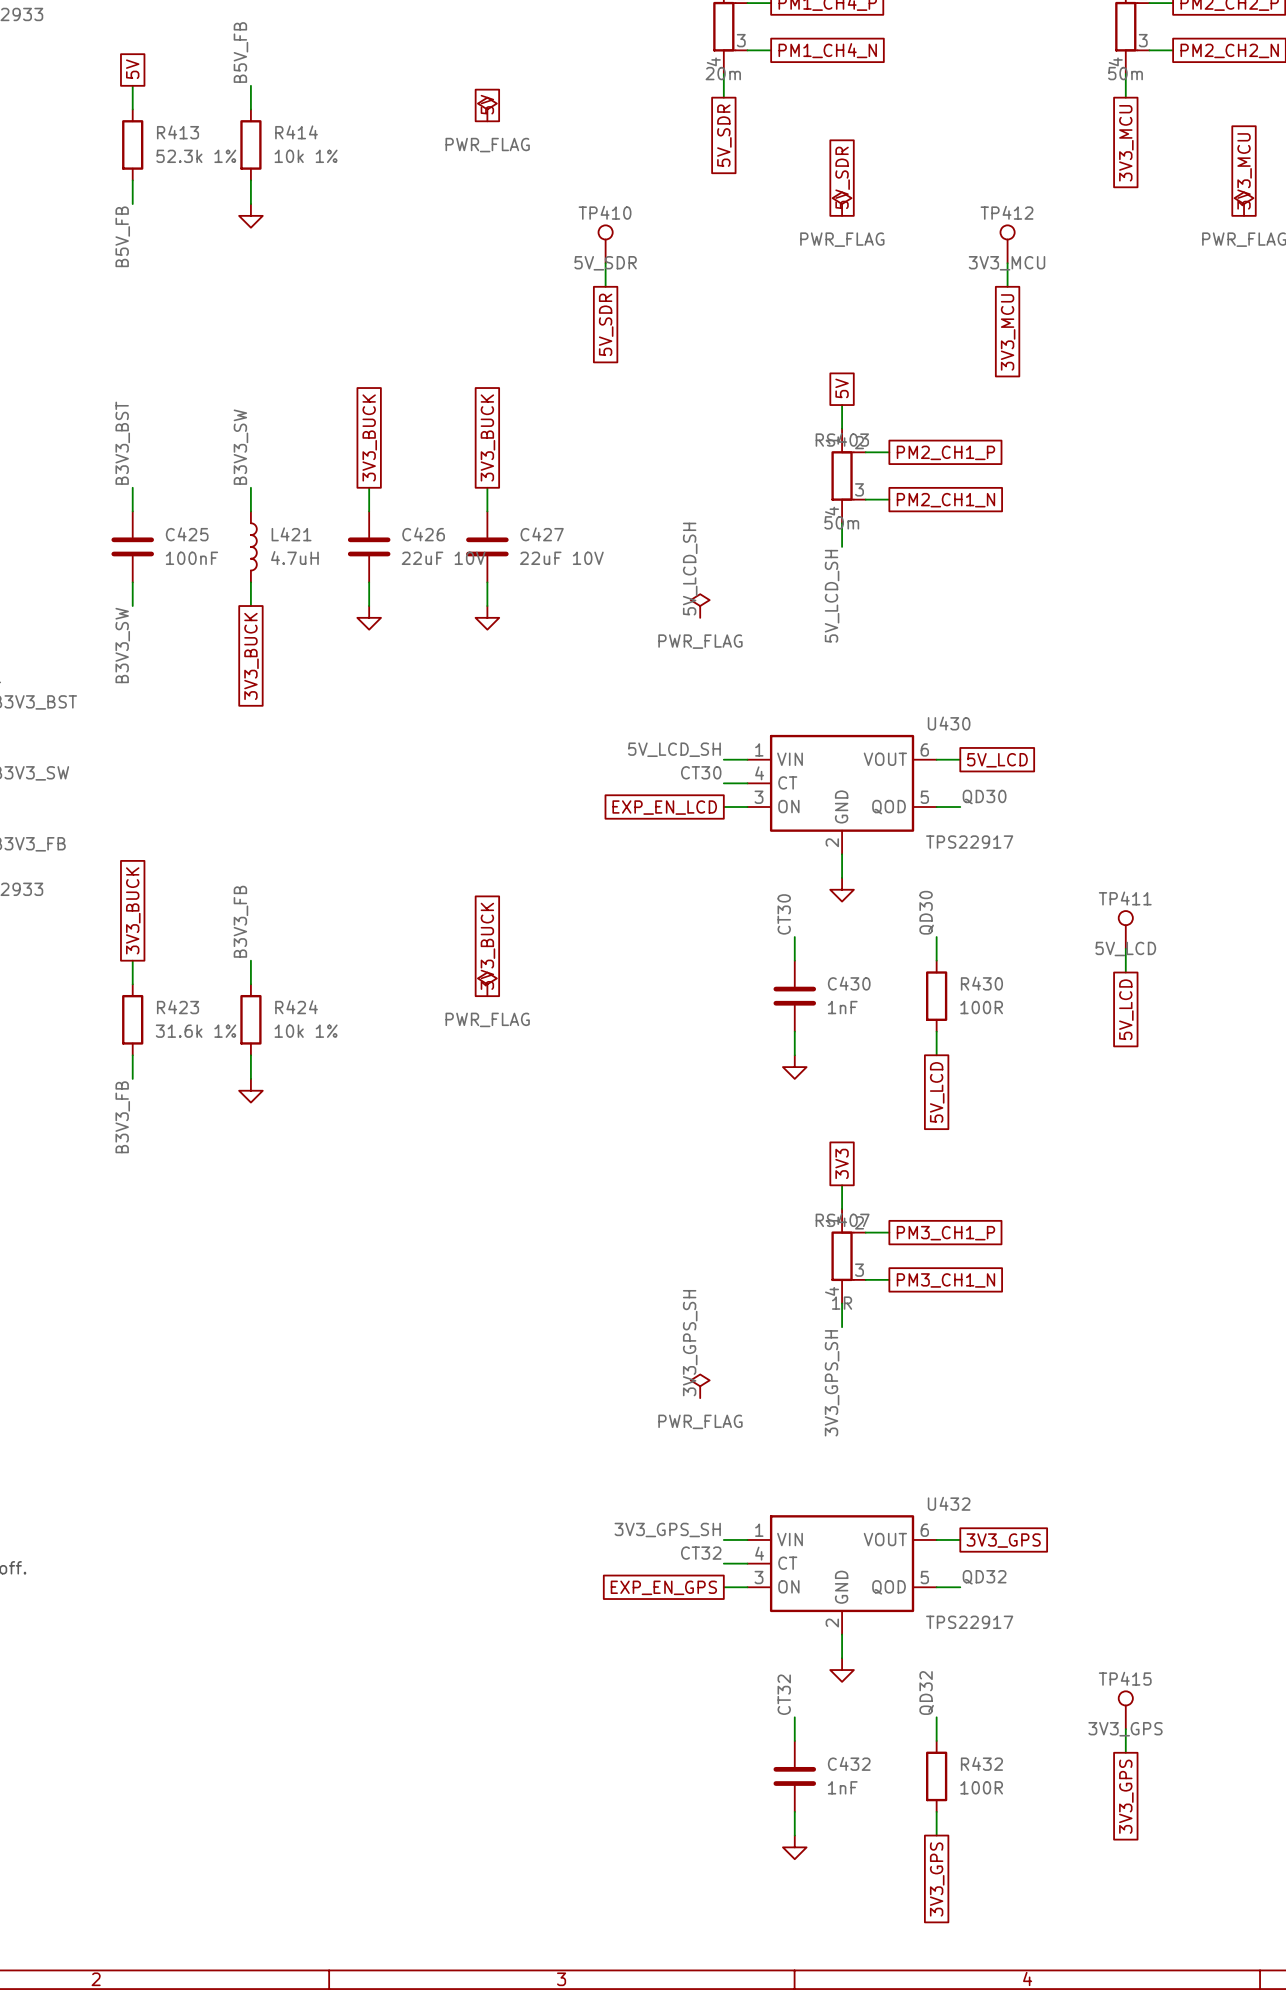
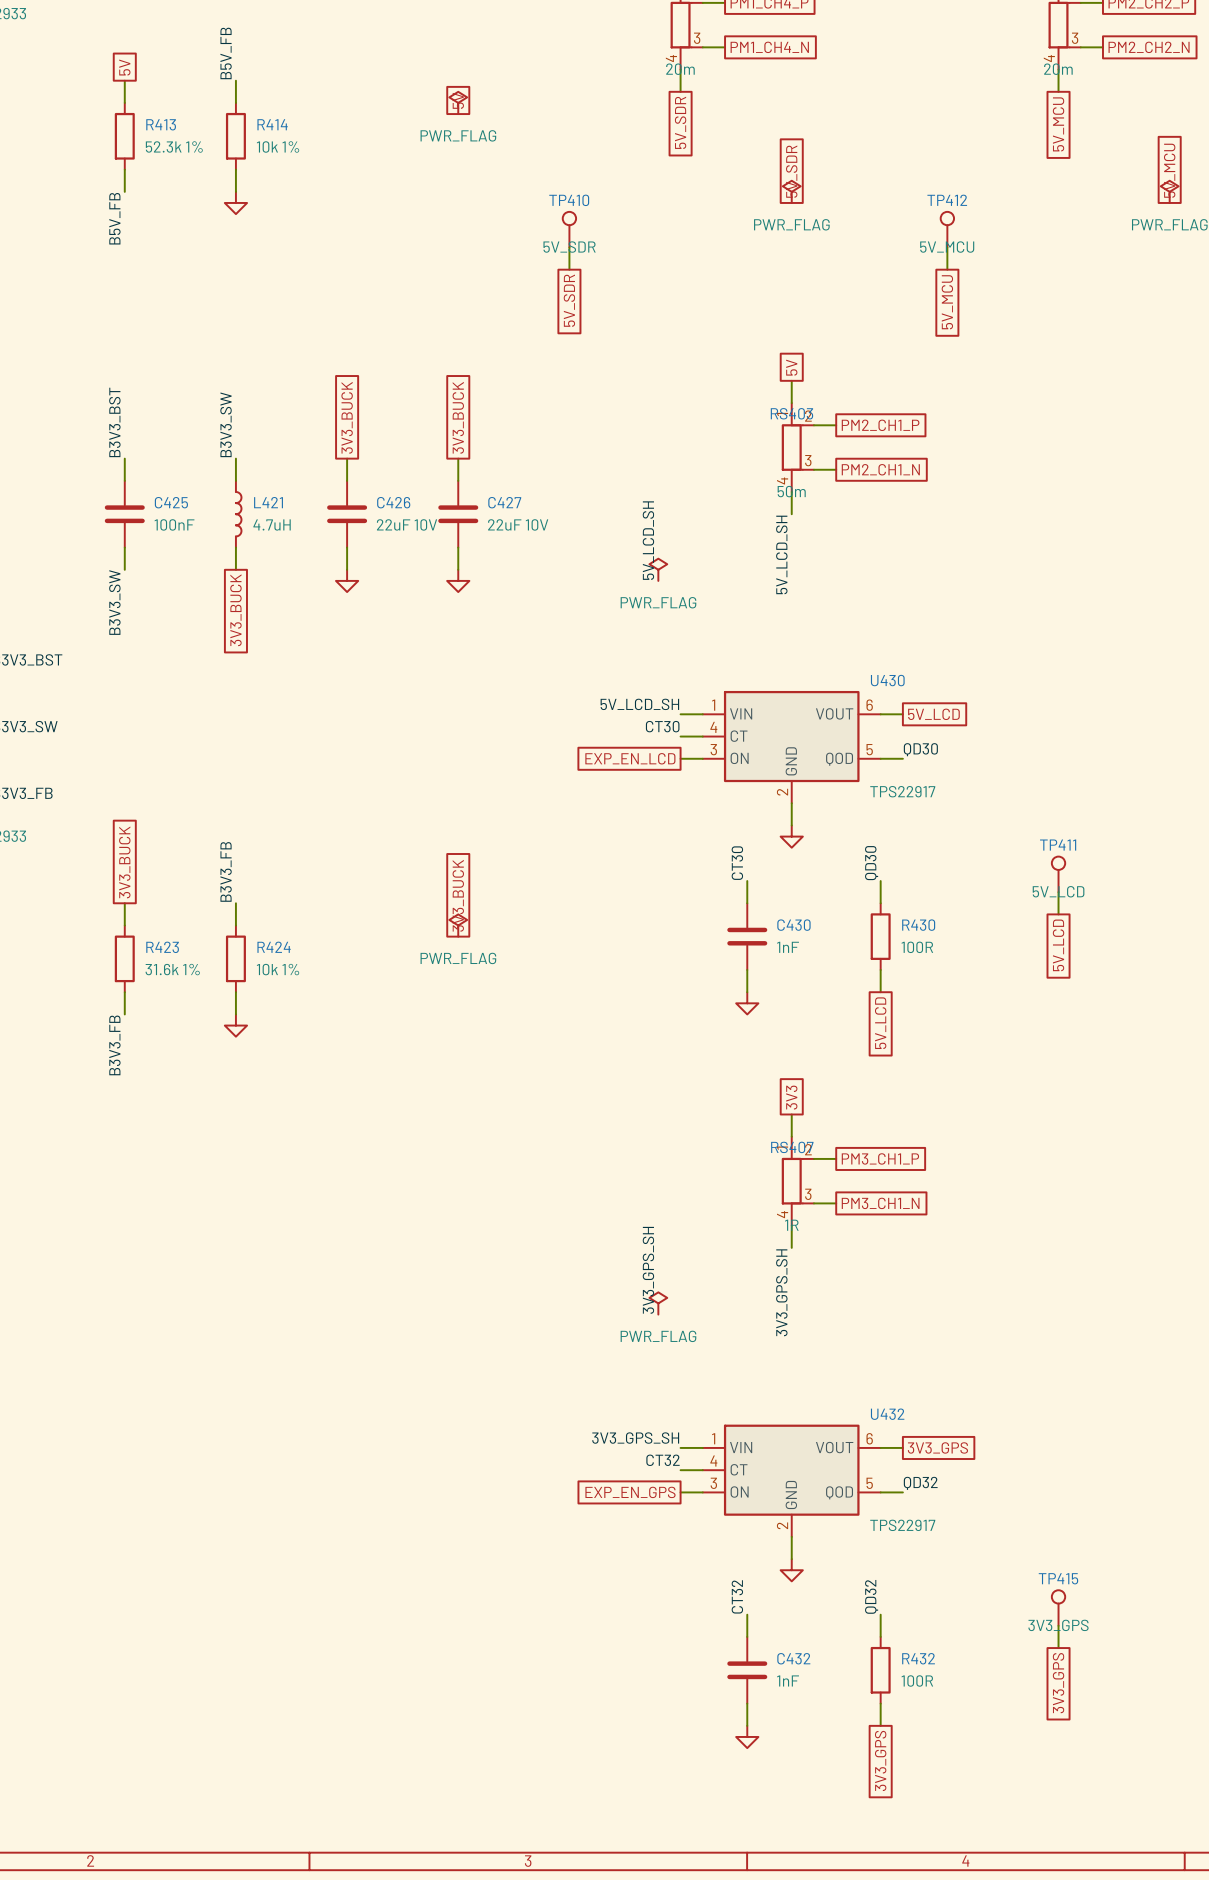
part value: 50m (1125, 73) -> 20m (1058, 69)
global label: 3V3_MCU (1126, 143) -> 5V_MCU (1058, 124)
global label: 3V3_MCU (1244, 171) -> 5V_MCU (1169, 170)
TP412 value: 3V3_MCU (1007, 263) -> 5V_MCU (947, 247)
global label: 3V3_MCU (1008, 332) -> 5V_MCU (947, 302)

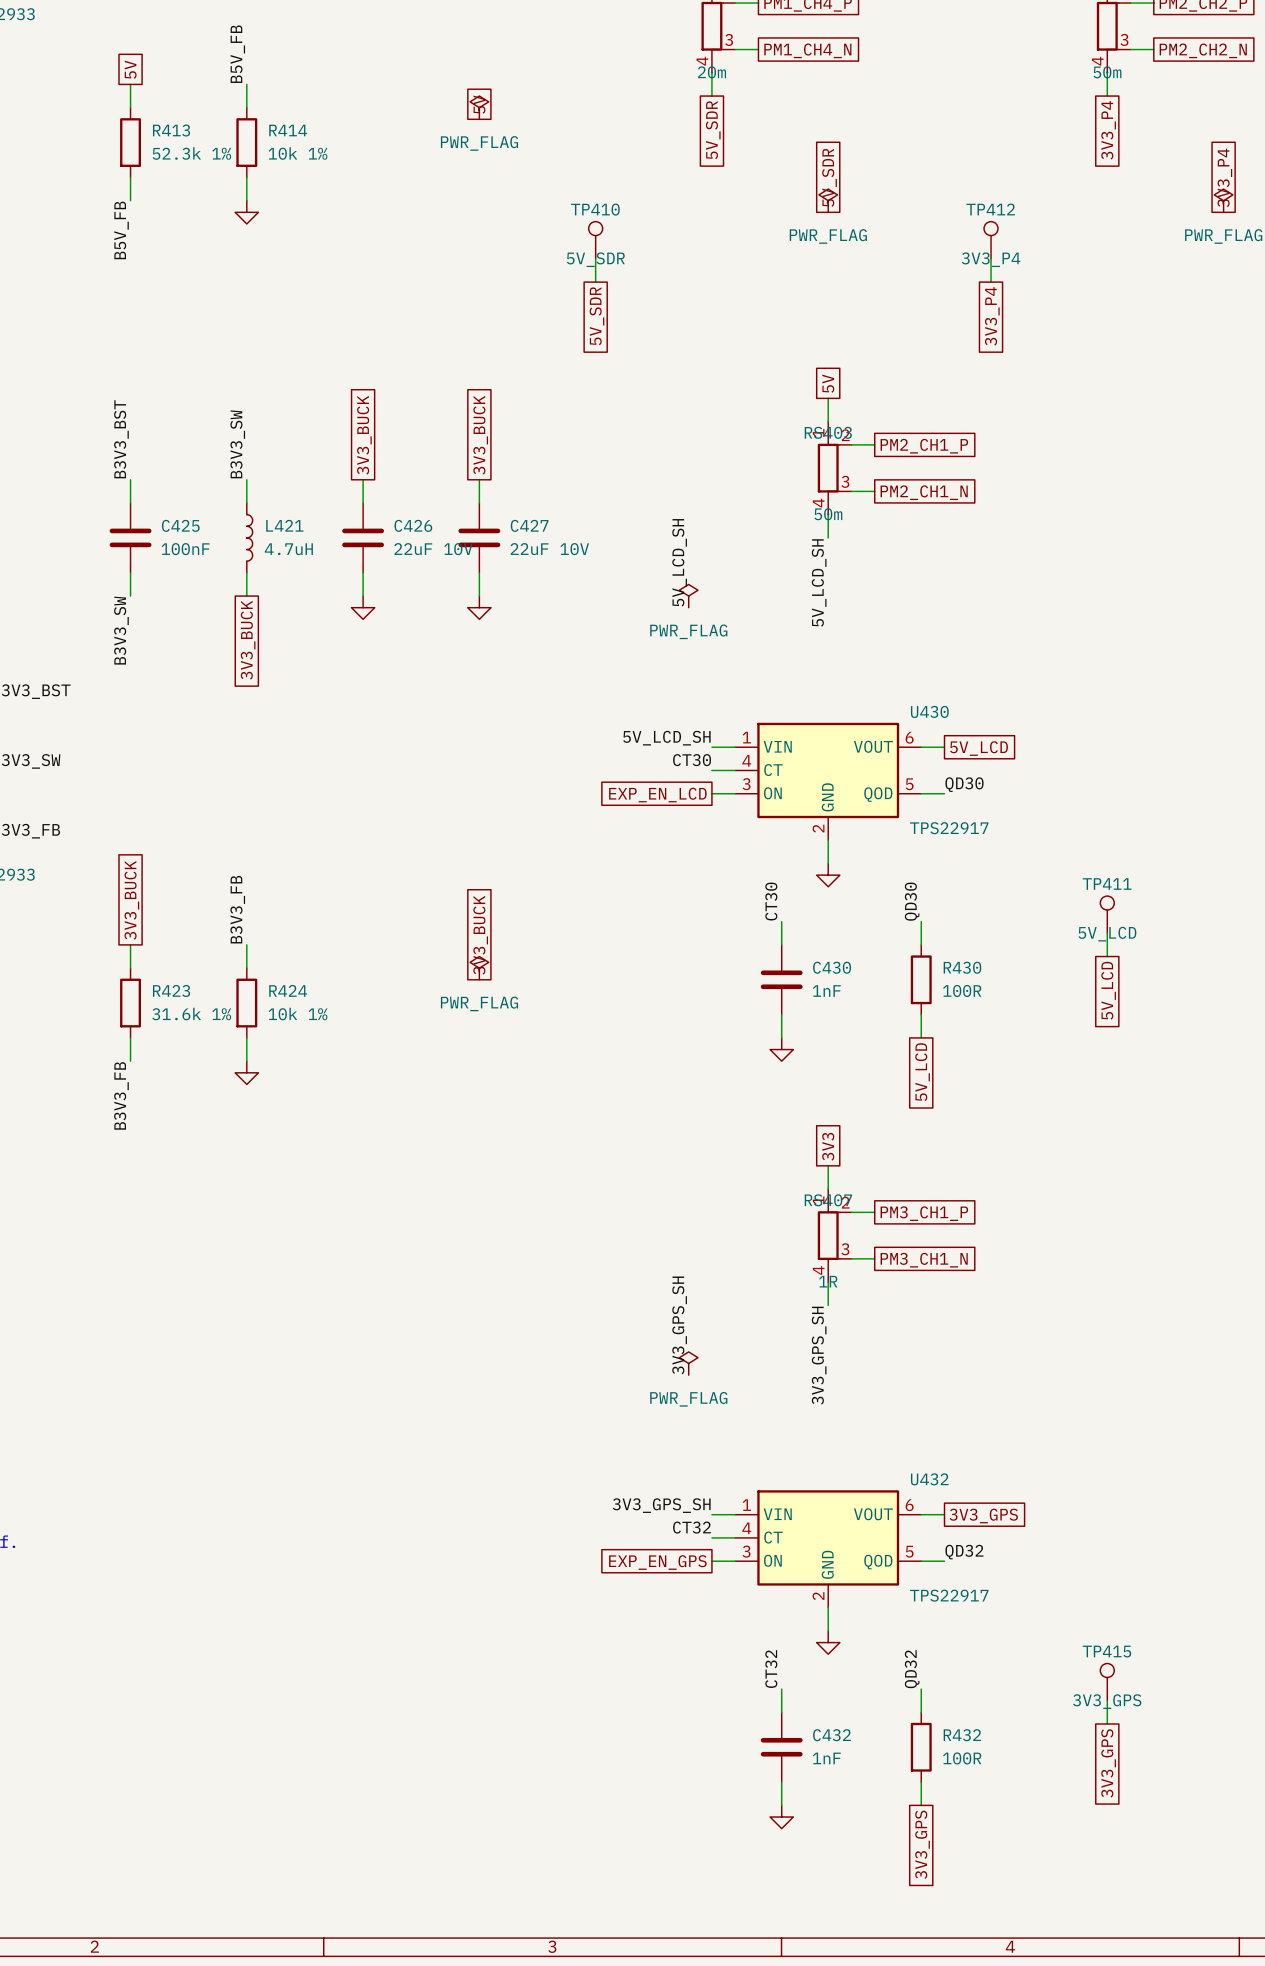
part value: 20m (1058, 69) -> 50m (1107, 72)
global label: 5V_MCU (1058, 124) -> 3V3_P4 (1108, 130)
global label: 5V_MCU (1169, 170) -> 3V3_P4 (1224, 177)
TP412 value: 5V_MCU (947, 247) -> 3V3_P4 (991, 259)
global label: 5V_MCU (947, 302) -> 3V3_P4 (992, 316)

